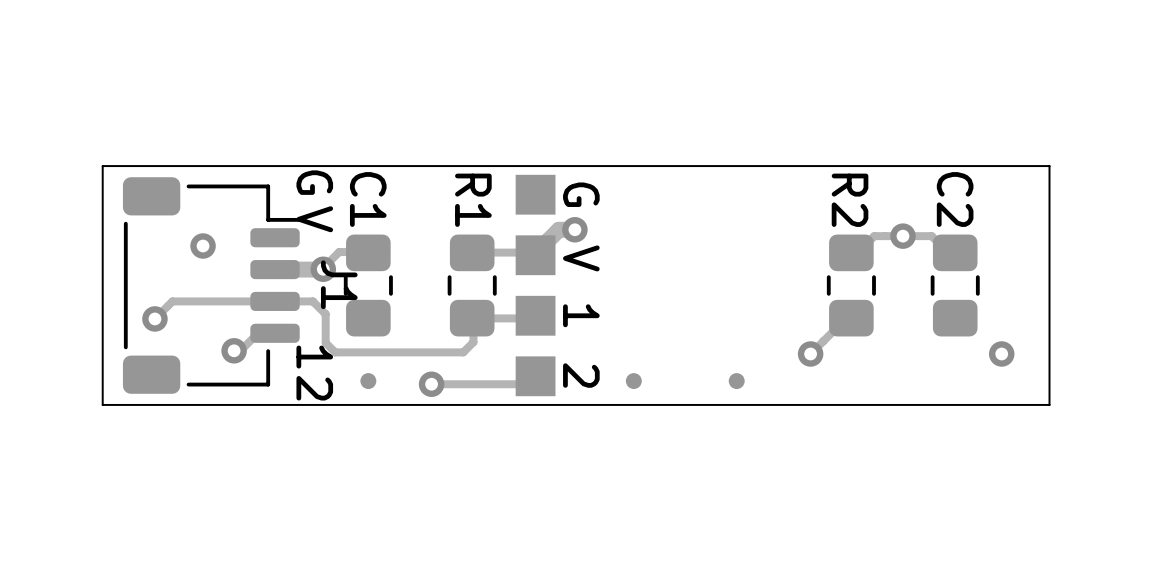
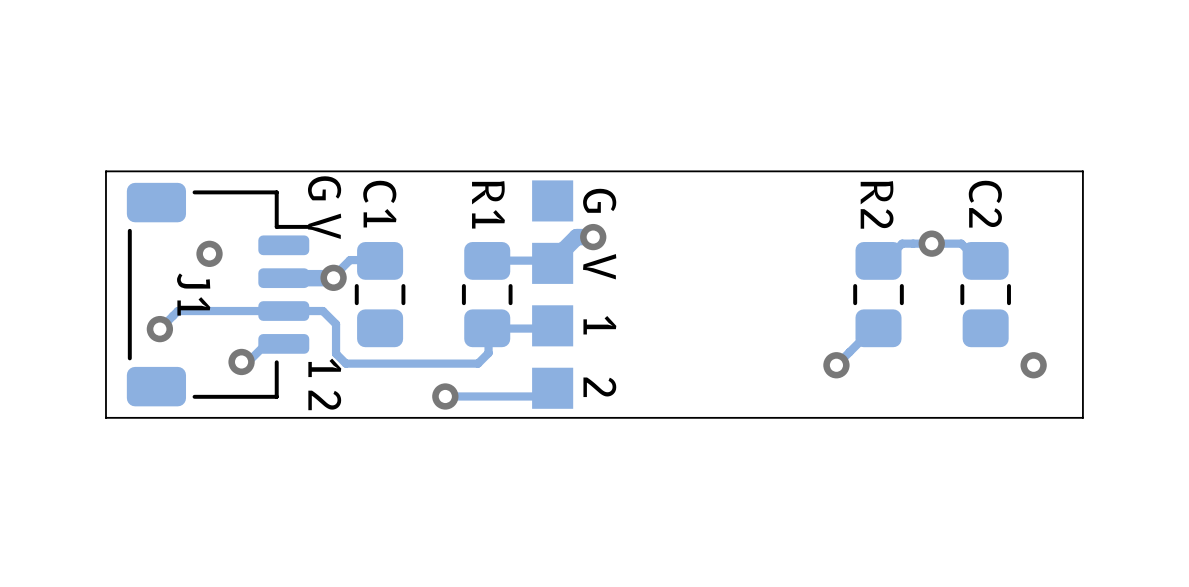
J1 name position: J1 (339, 284) -> J1 (193, 294)
part: (368, 381) -> none
part: (633, 381) -> none
part: (736, 381) -> none

